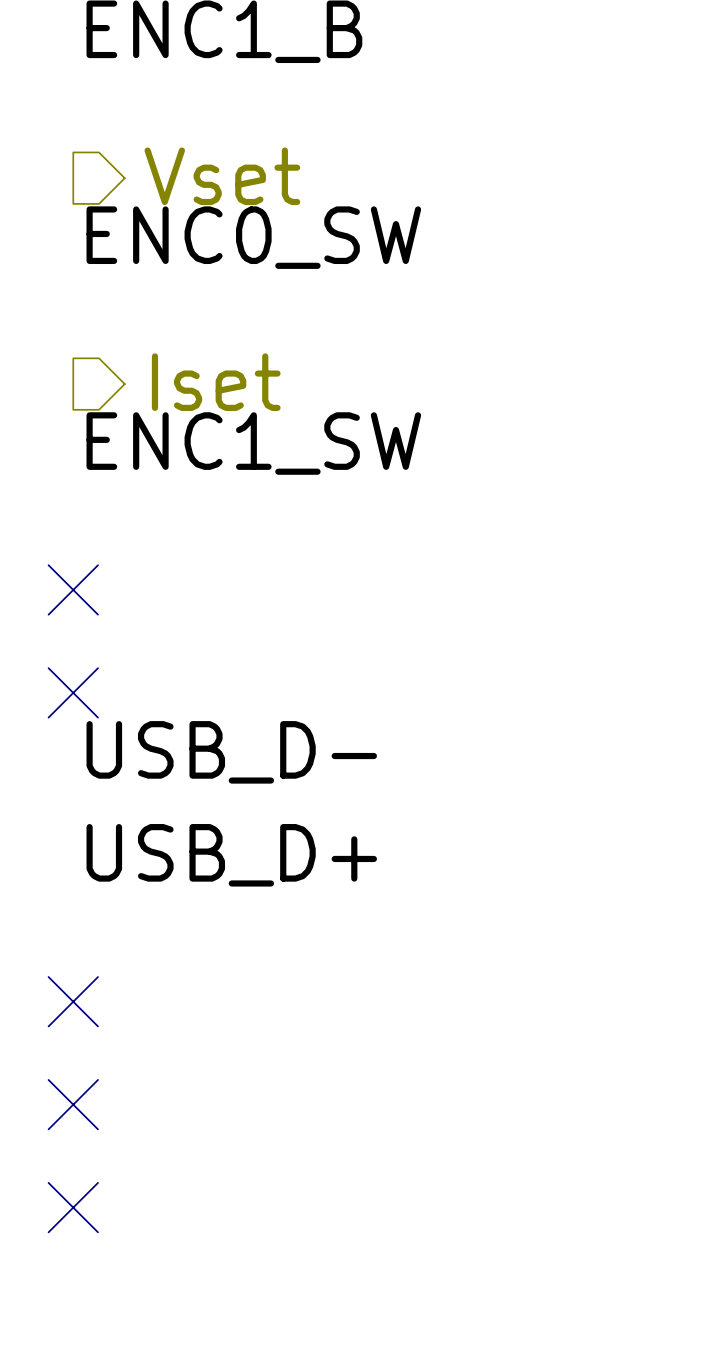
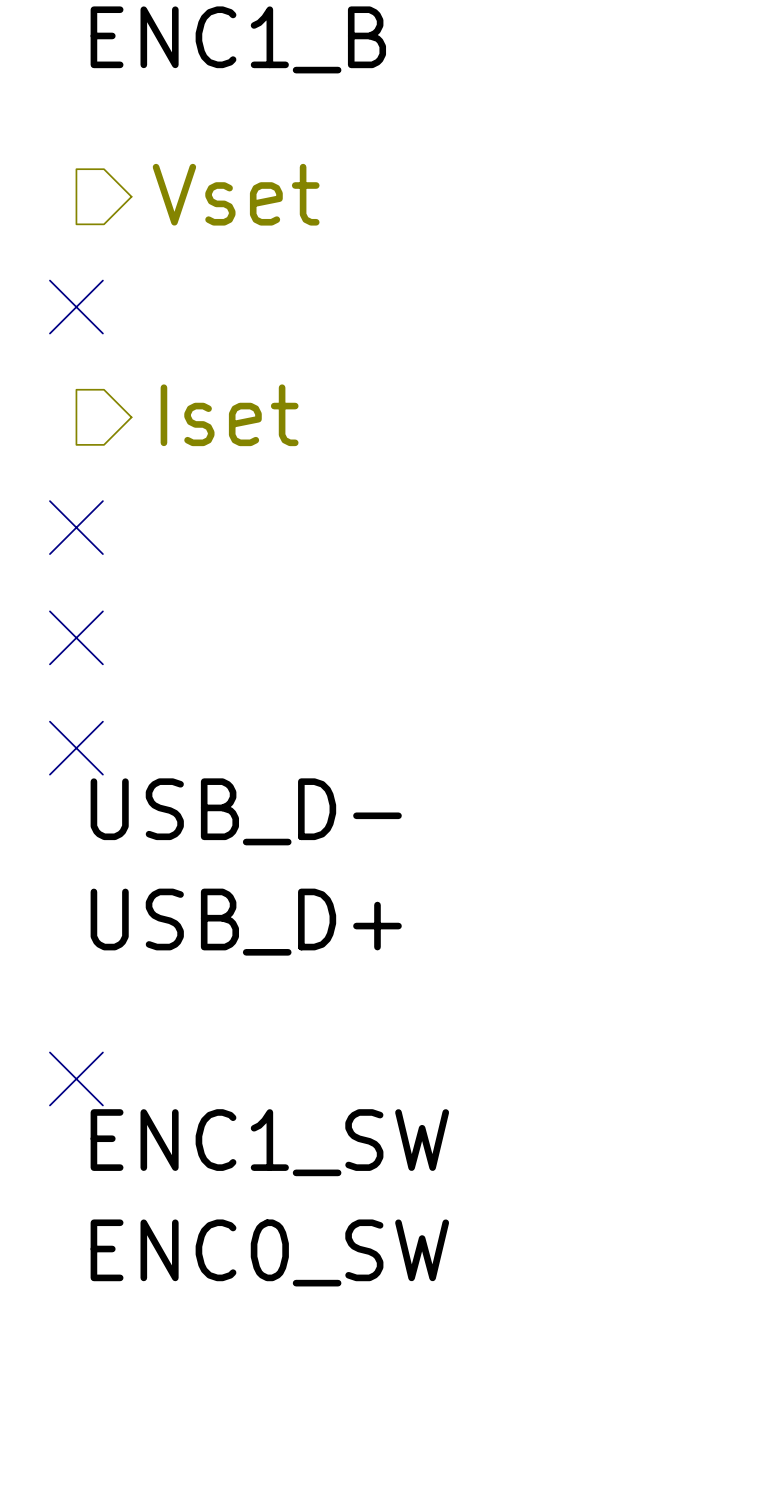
label position: ENC0_SW (253, 237) -> ENC0_SW (269, 1252)
no-connect mark: none -> (76, 307)
label position: ENC1_SW (253, 443) -> ENC1_SW (269, 1142)
no-connect mark: none -> (76, 527)
no-connect mark: (73, 1104) -> none
no-connect mark: (73, 1207) -> none

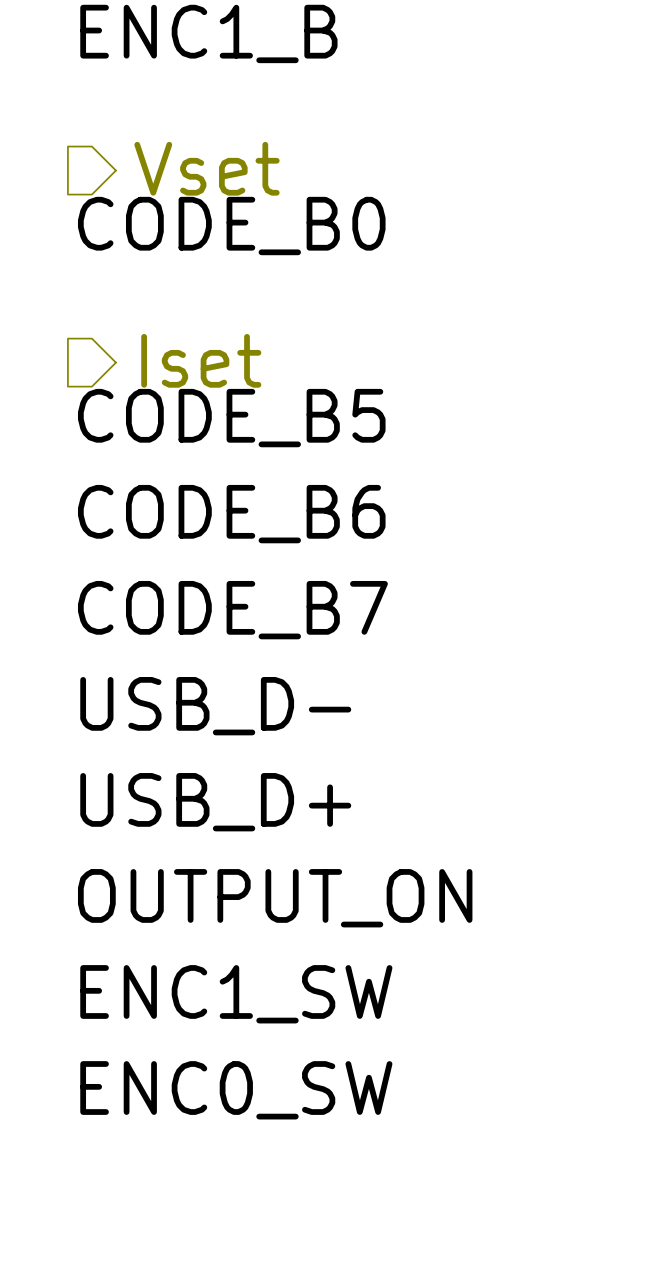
label: none -> CODE_B0 (231, 226)
no-connect mark: (76, 307) -> none
label: none -> CODE_B5 (231, 418)
no-connect mark: (76, 527) -> none
label: none -> CODE_B6 (231, 514)
no-connect mark: (76, 637) -> none
label: none -> CODE_B7 (232, 610)
no-connect mark: (76, 748) -> none
label: none -> OUTPUT_ON (275, 898)
no-connect mark: (76, 1078) -> none

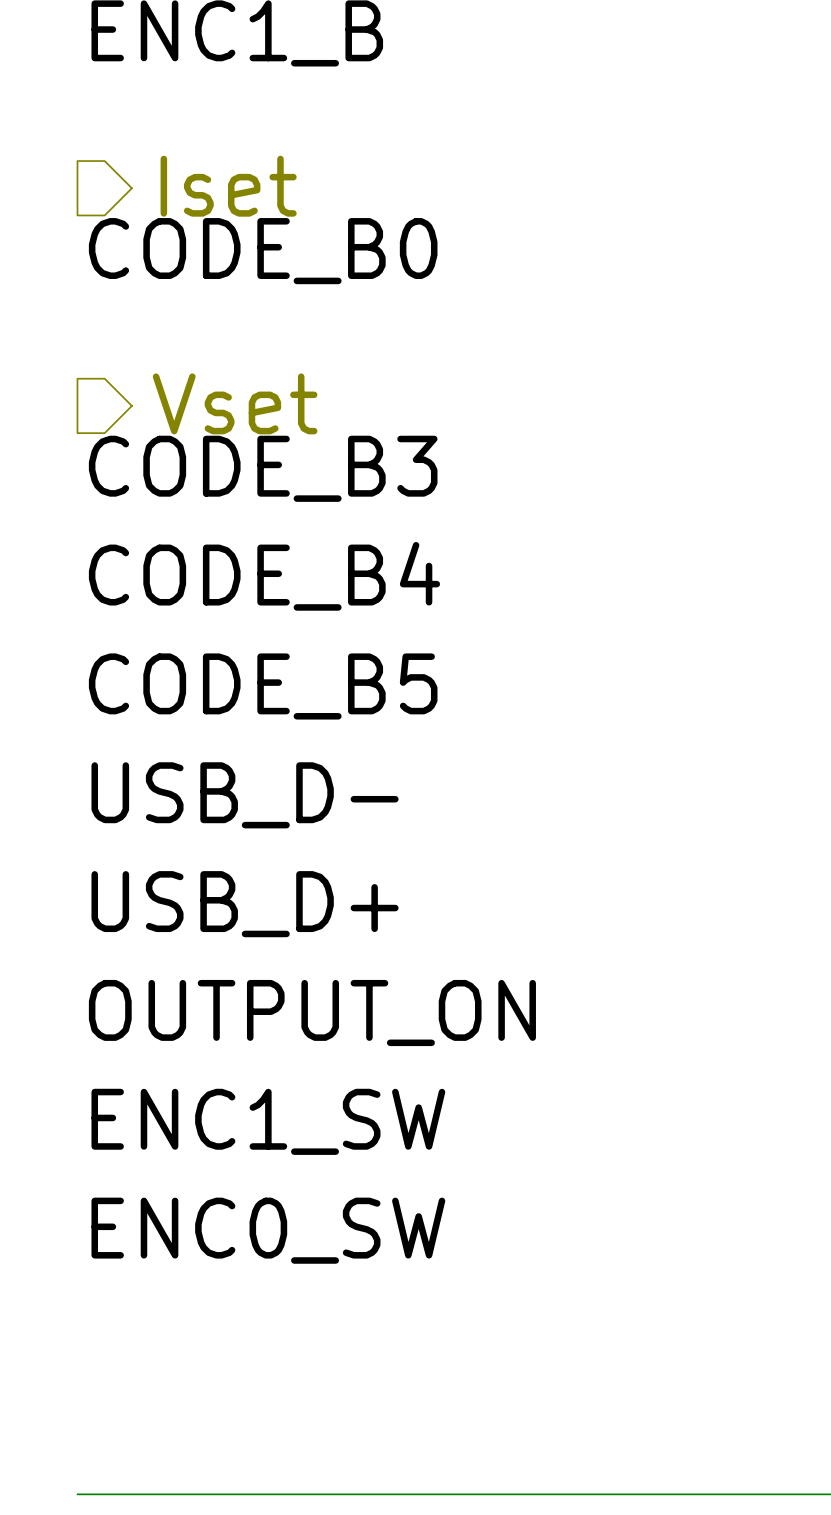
hierarchical label: Vset (207, 168) -> Iset (228, 186)
hierarchical label: Iset (201, 360) -> Vset (235, 403)
label: CODE_B5 (231, 418) -> CODE_B3 (263, 468)
label: CODE_B6 (231, 514) -> CODE_B4 (264, 576)
label: CODE_B7 (232, 610) -> CODE_B5 (263, 686)

